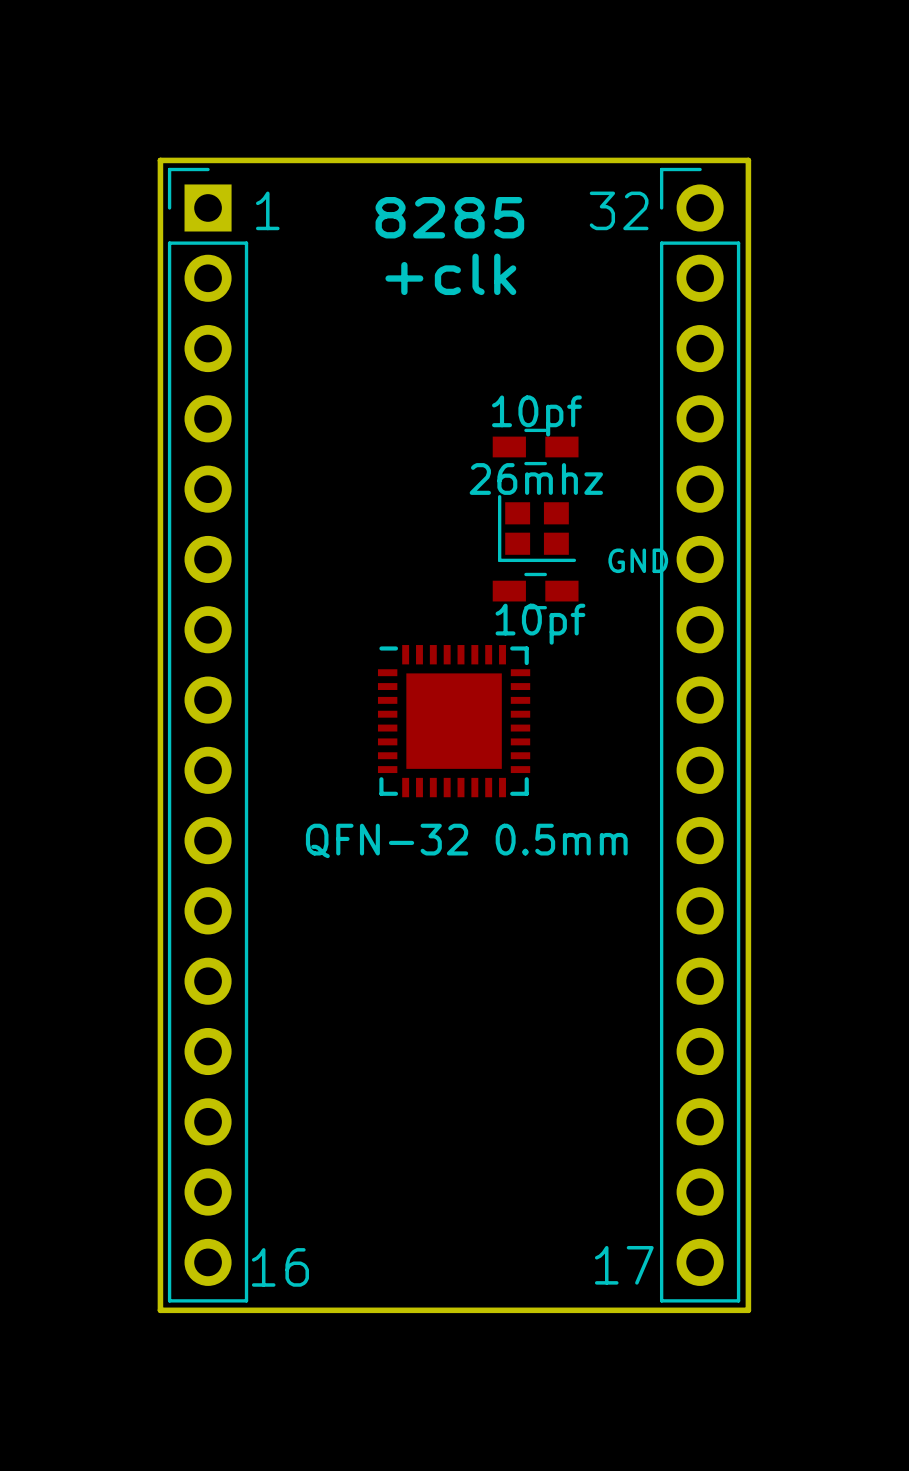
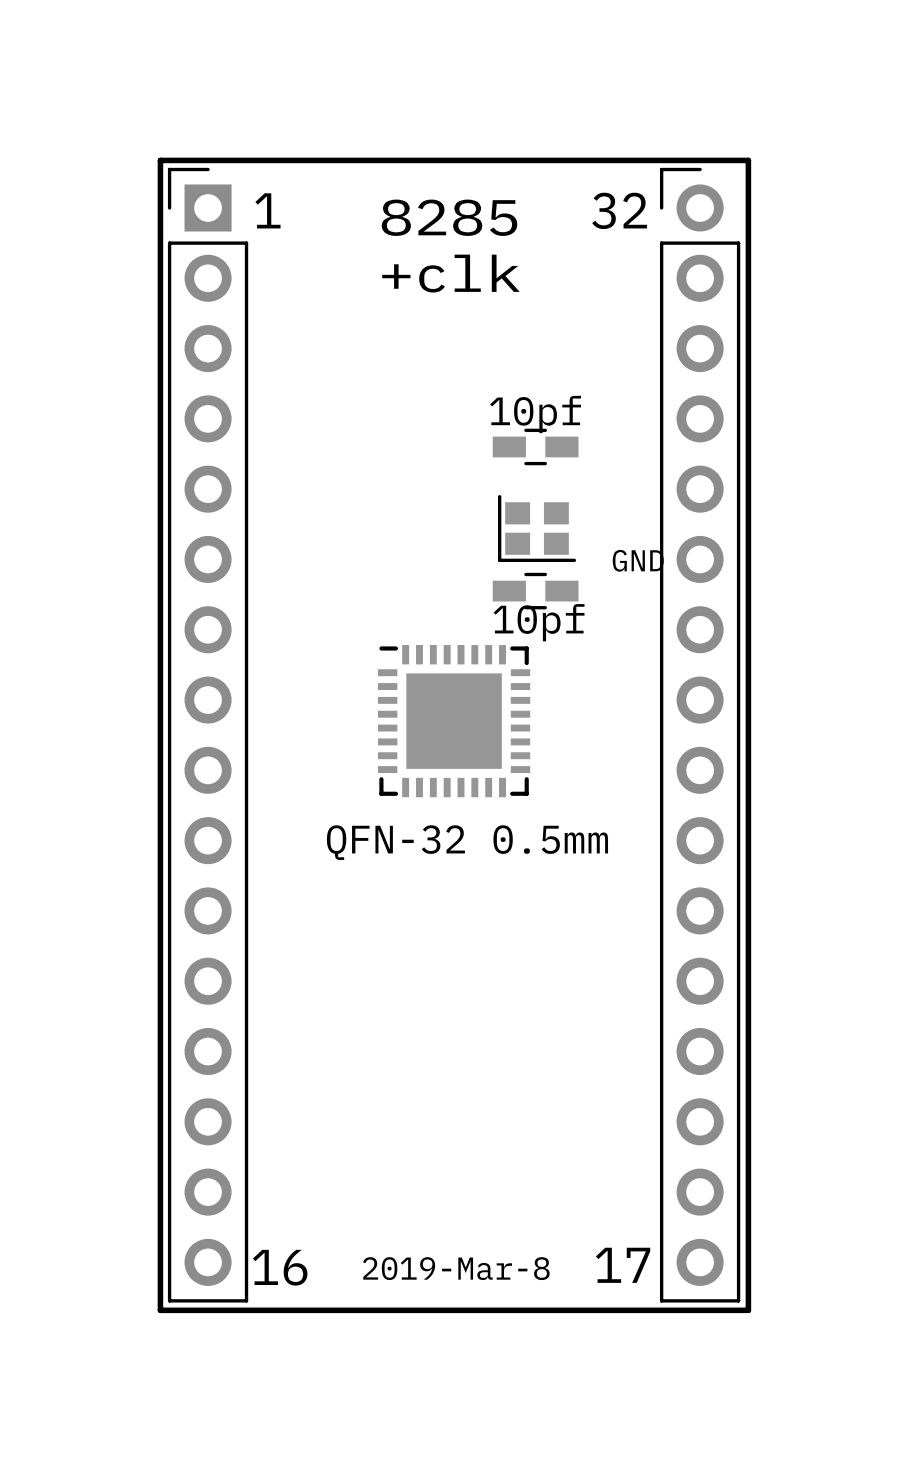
26mhz name: 26mhz (536, 478) -> none
text: none -> 2019-Mar-8 (456, 1268)

